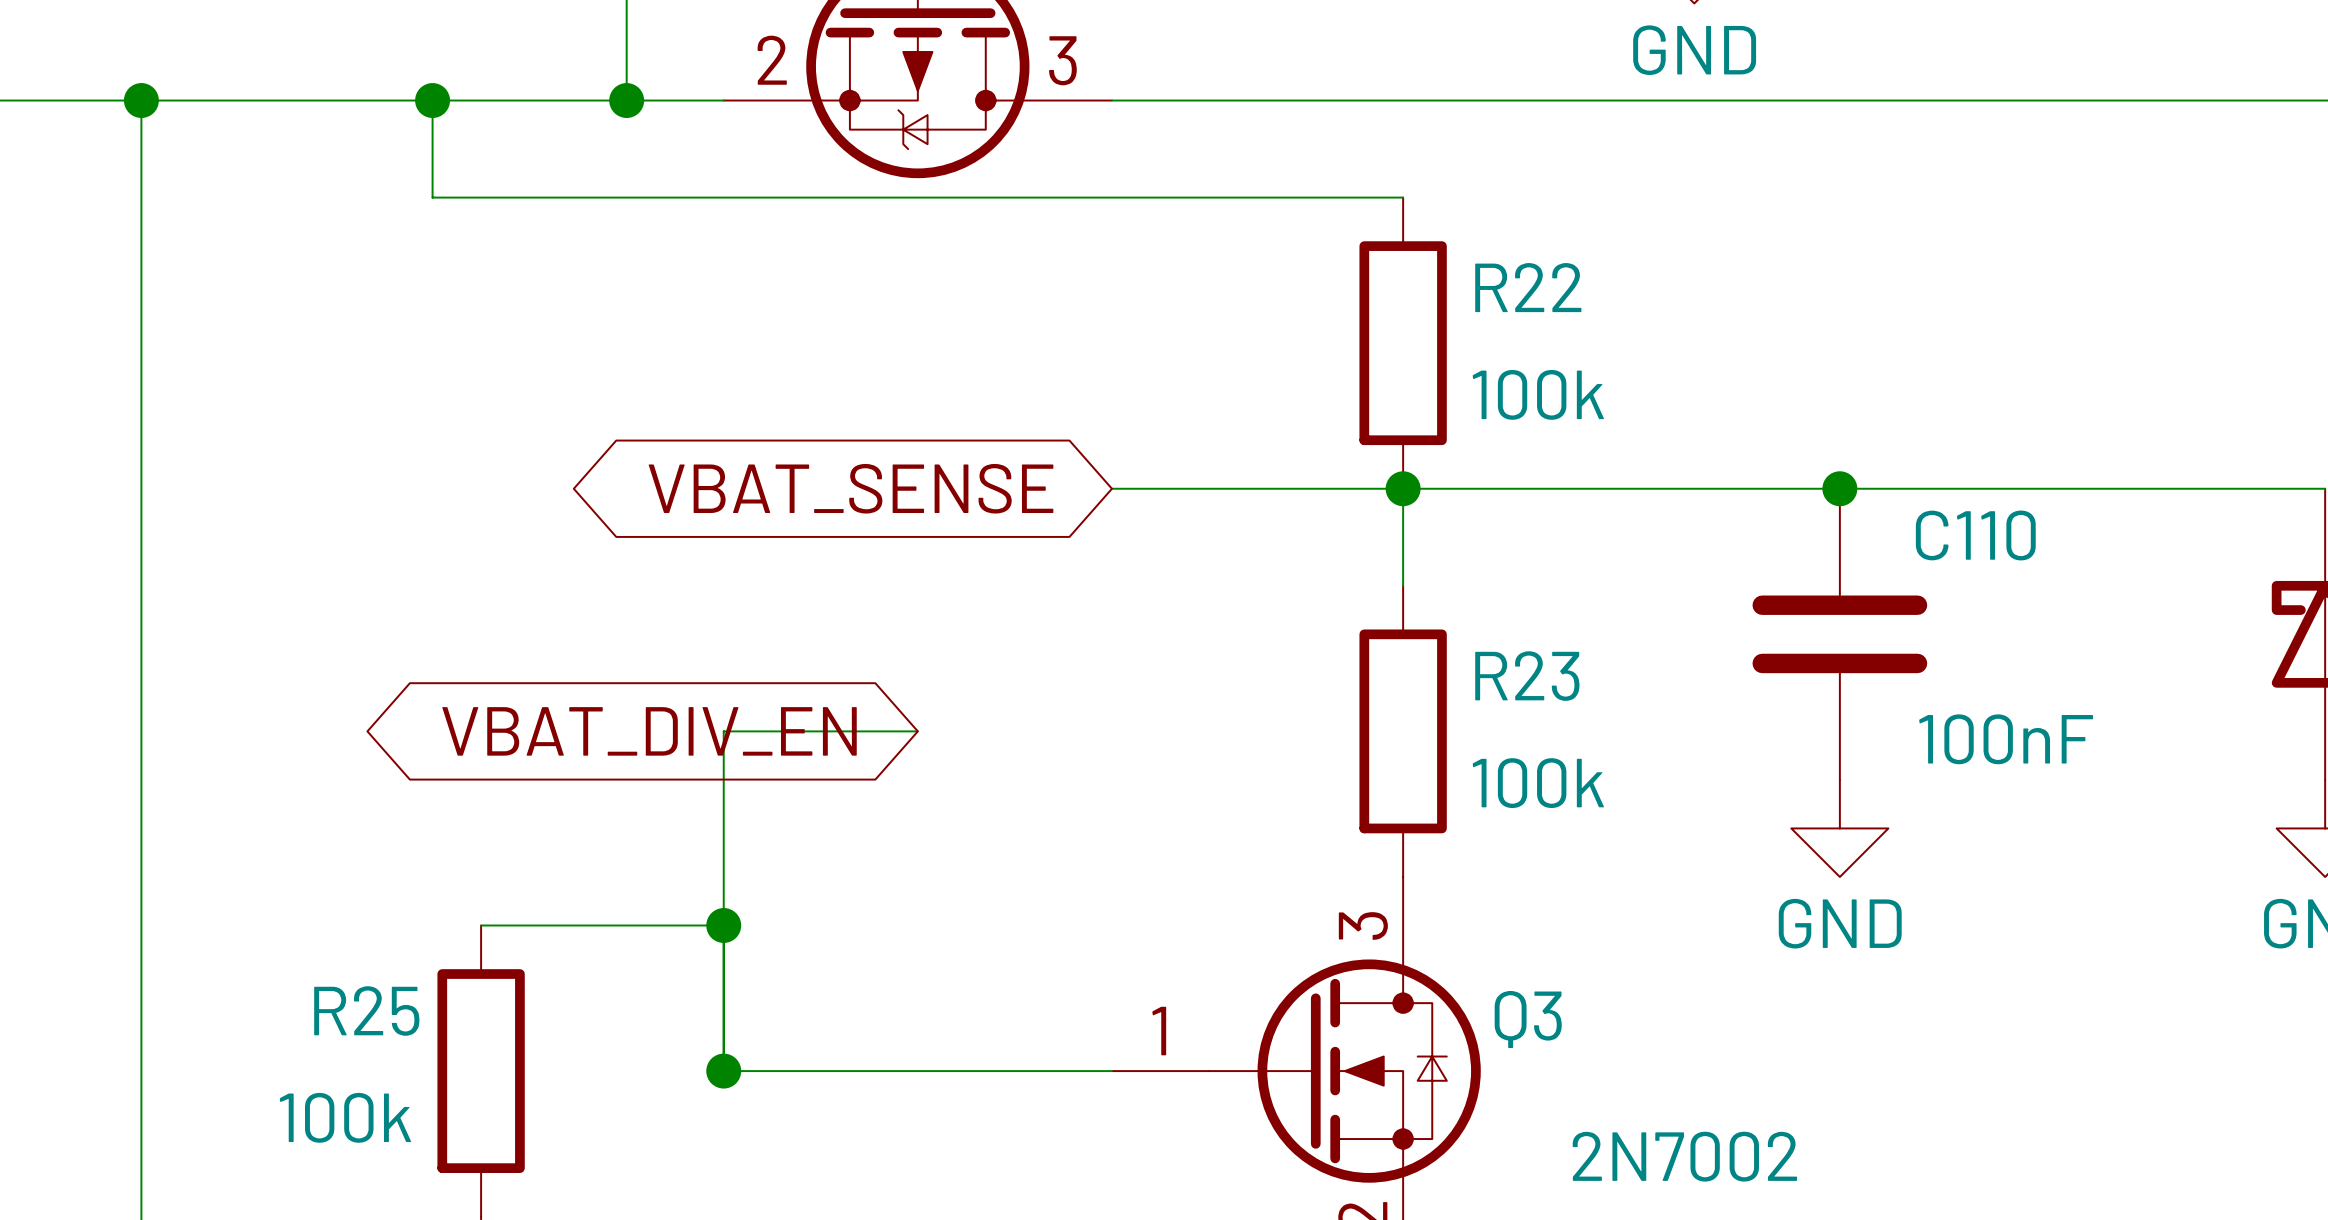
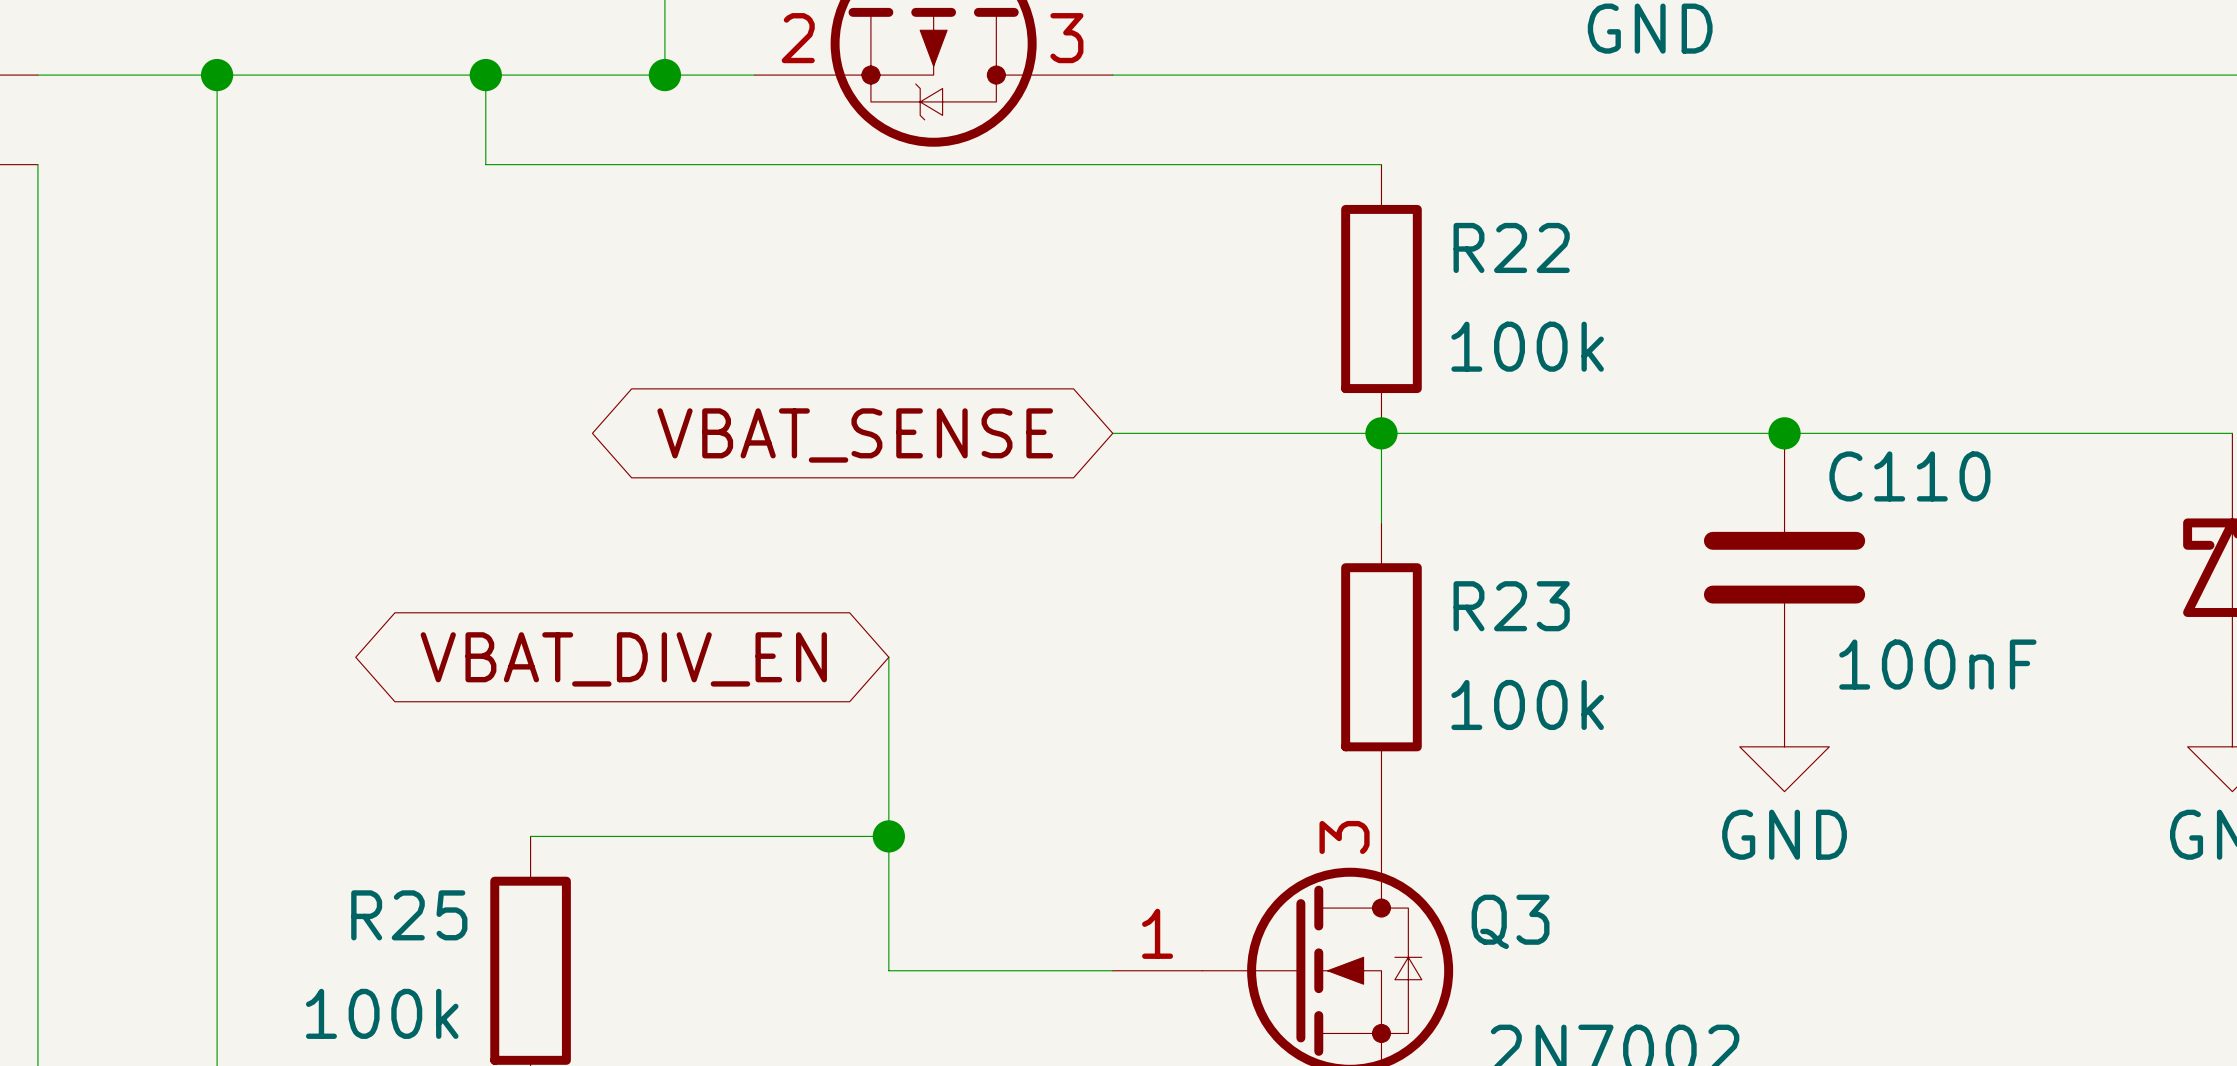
global label position: VBAT_DIV_EN (649, 731) -> VBAT_DIV_EN (623, 659)
wire: (917, 731) (723, 731) (723, 1071) (869, 1071) -> (888, 657) (888, 970)
wire: none -> (754, 836) (888, 836)
junction: (723, 925) -> none
junction: none -> (888, 836)
junction: (723, 1071) -> none

